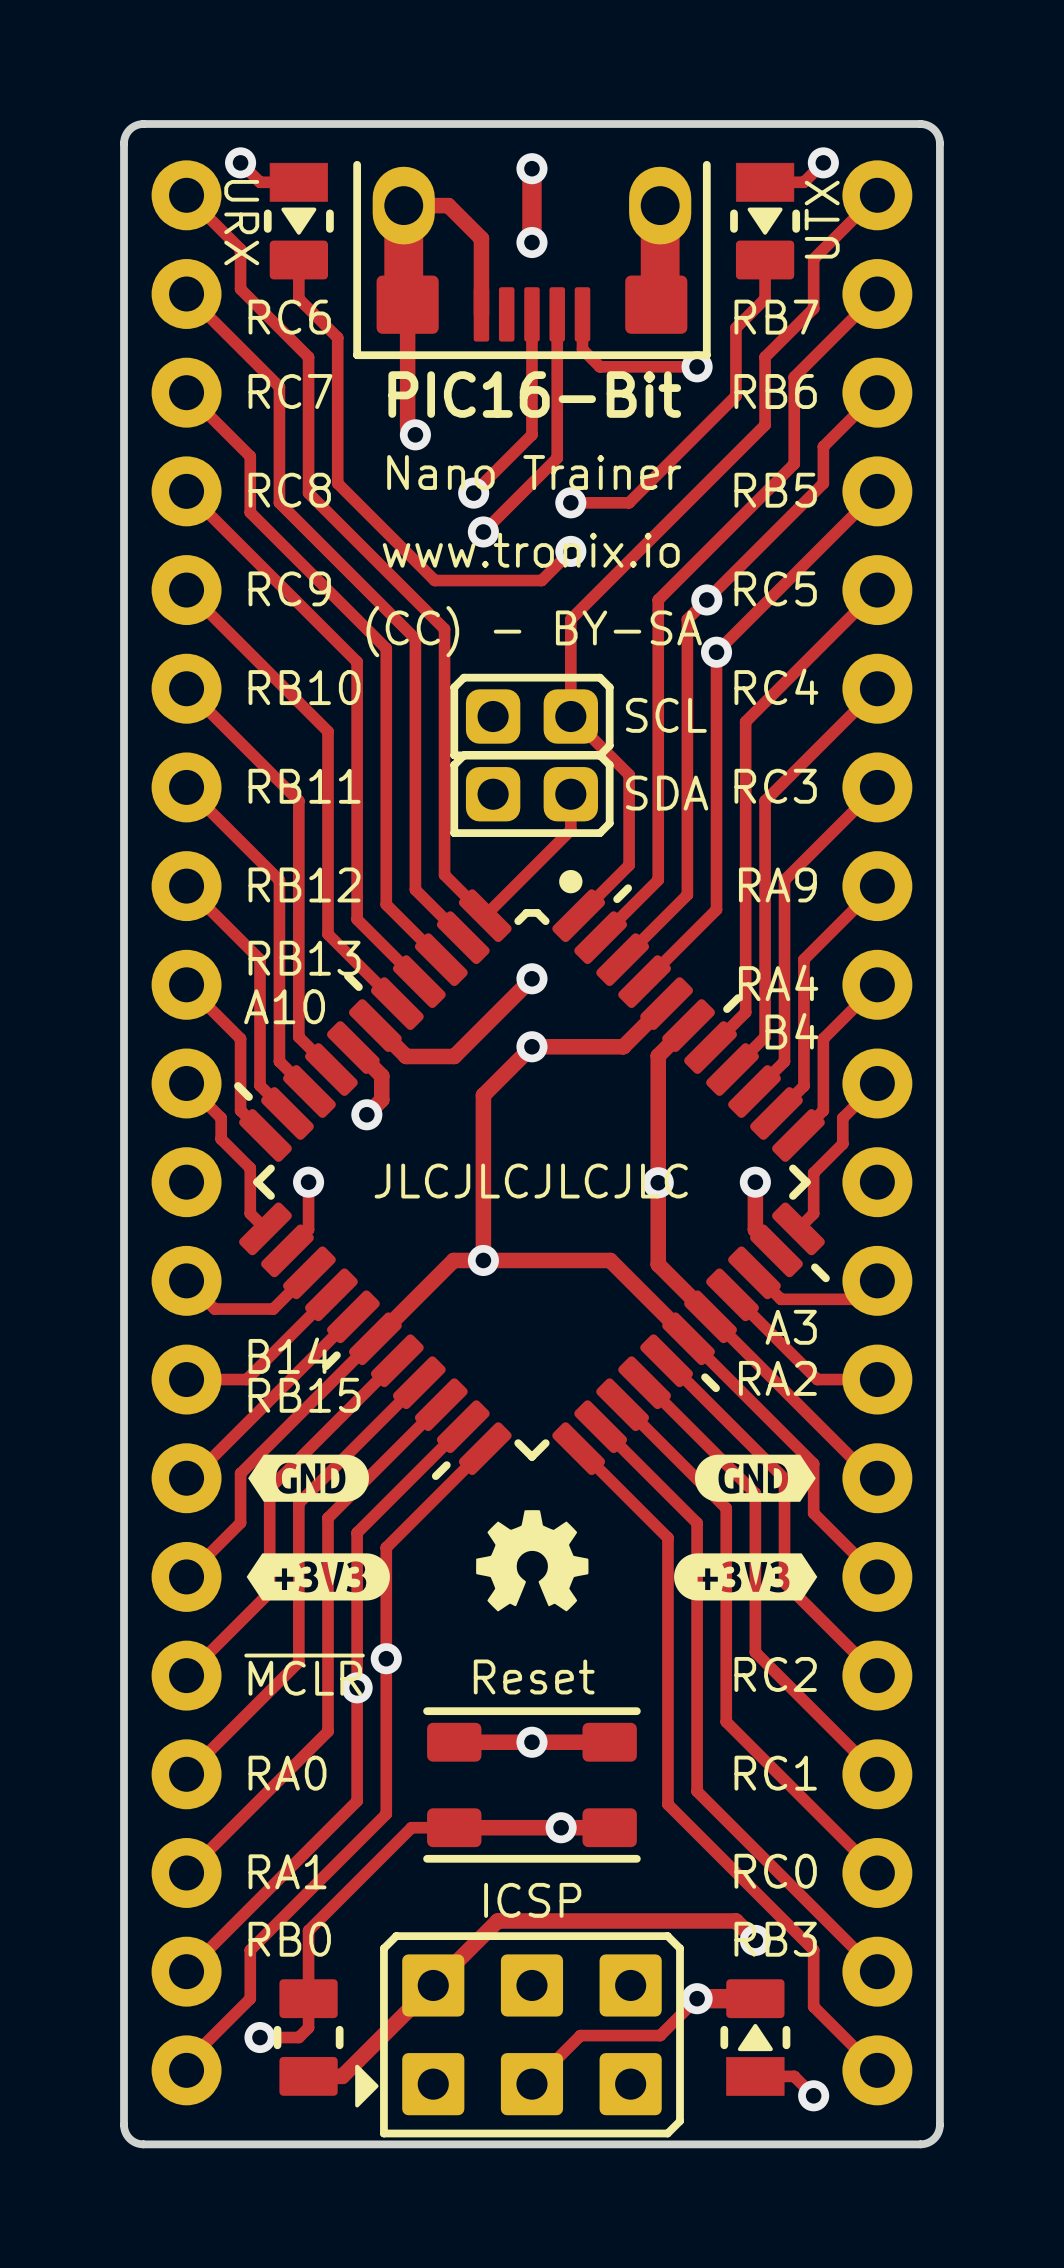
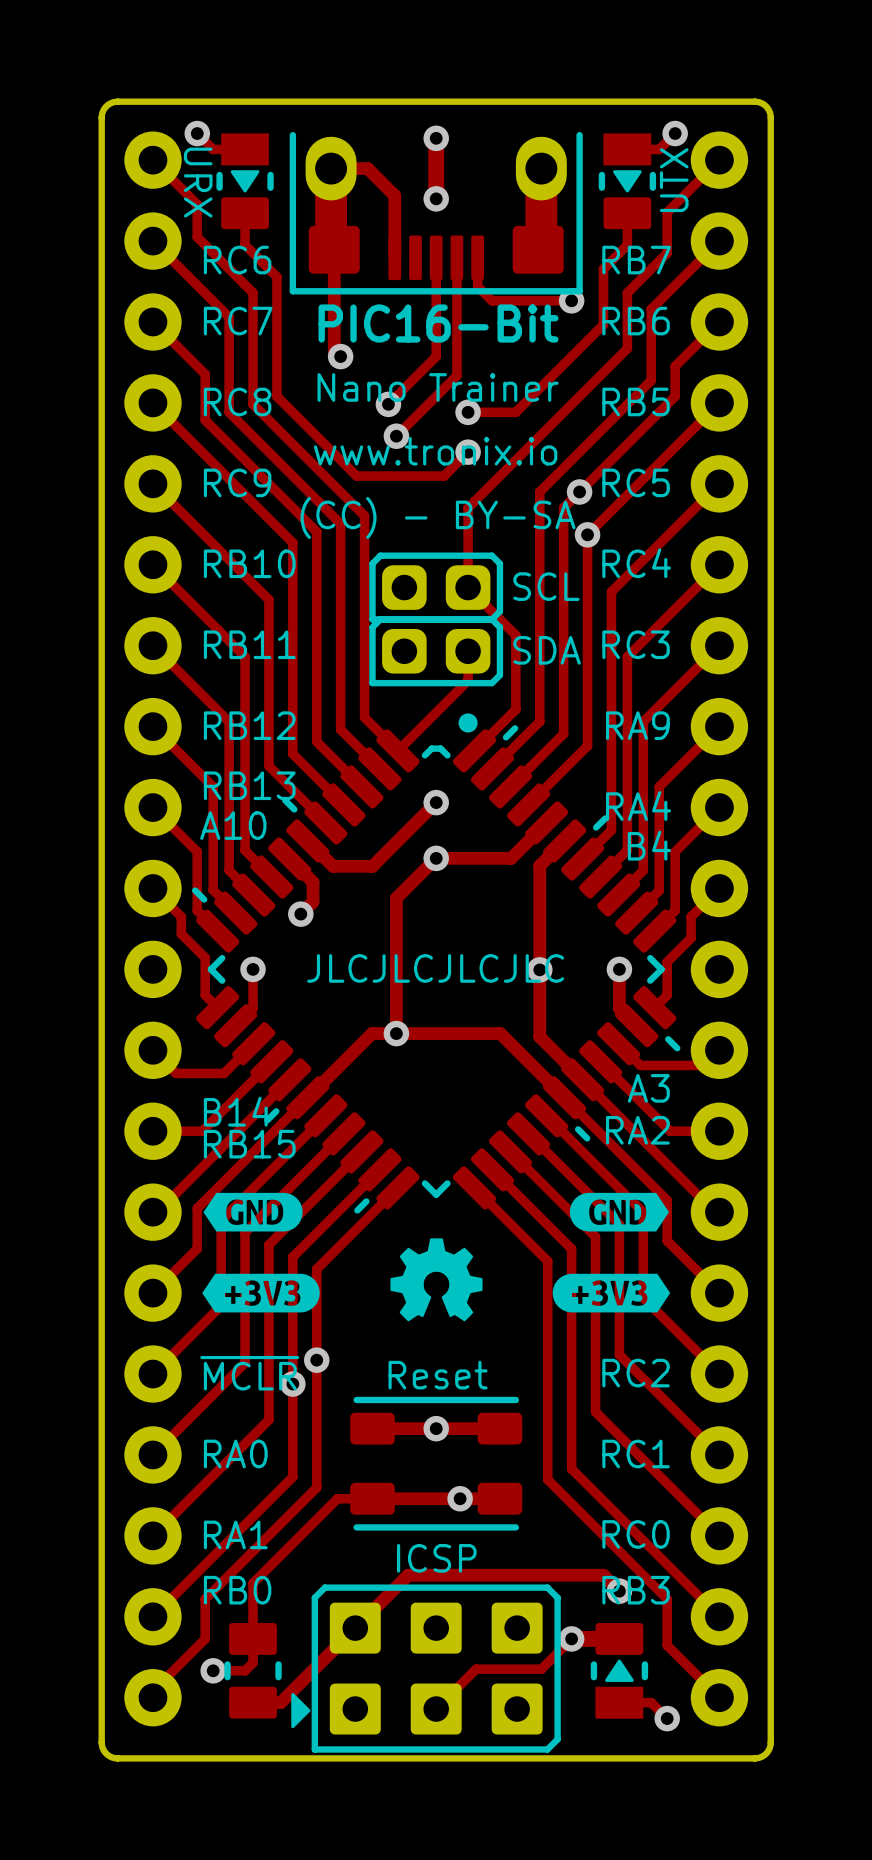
part footprint: [423, 1707, 641, 1863] -> [350, 1396, 523, 1531]

